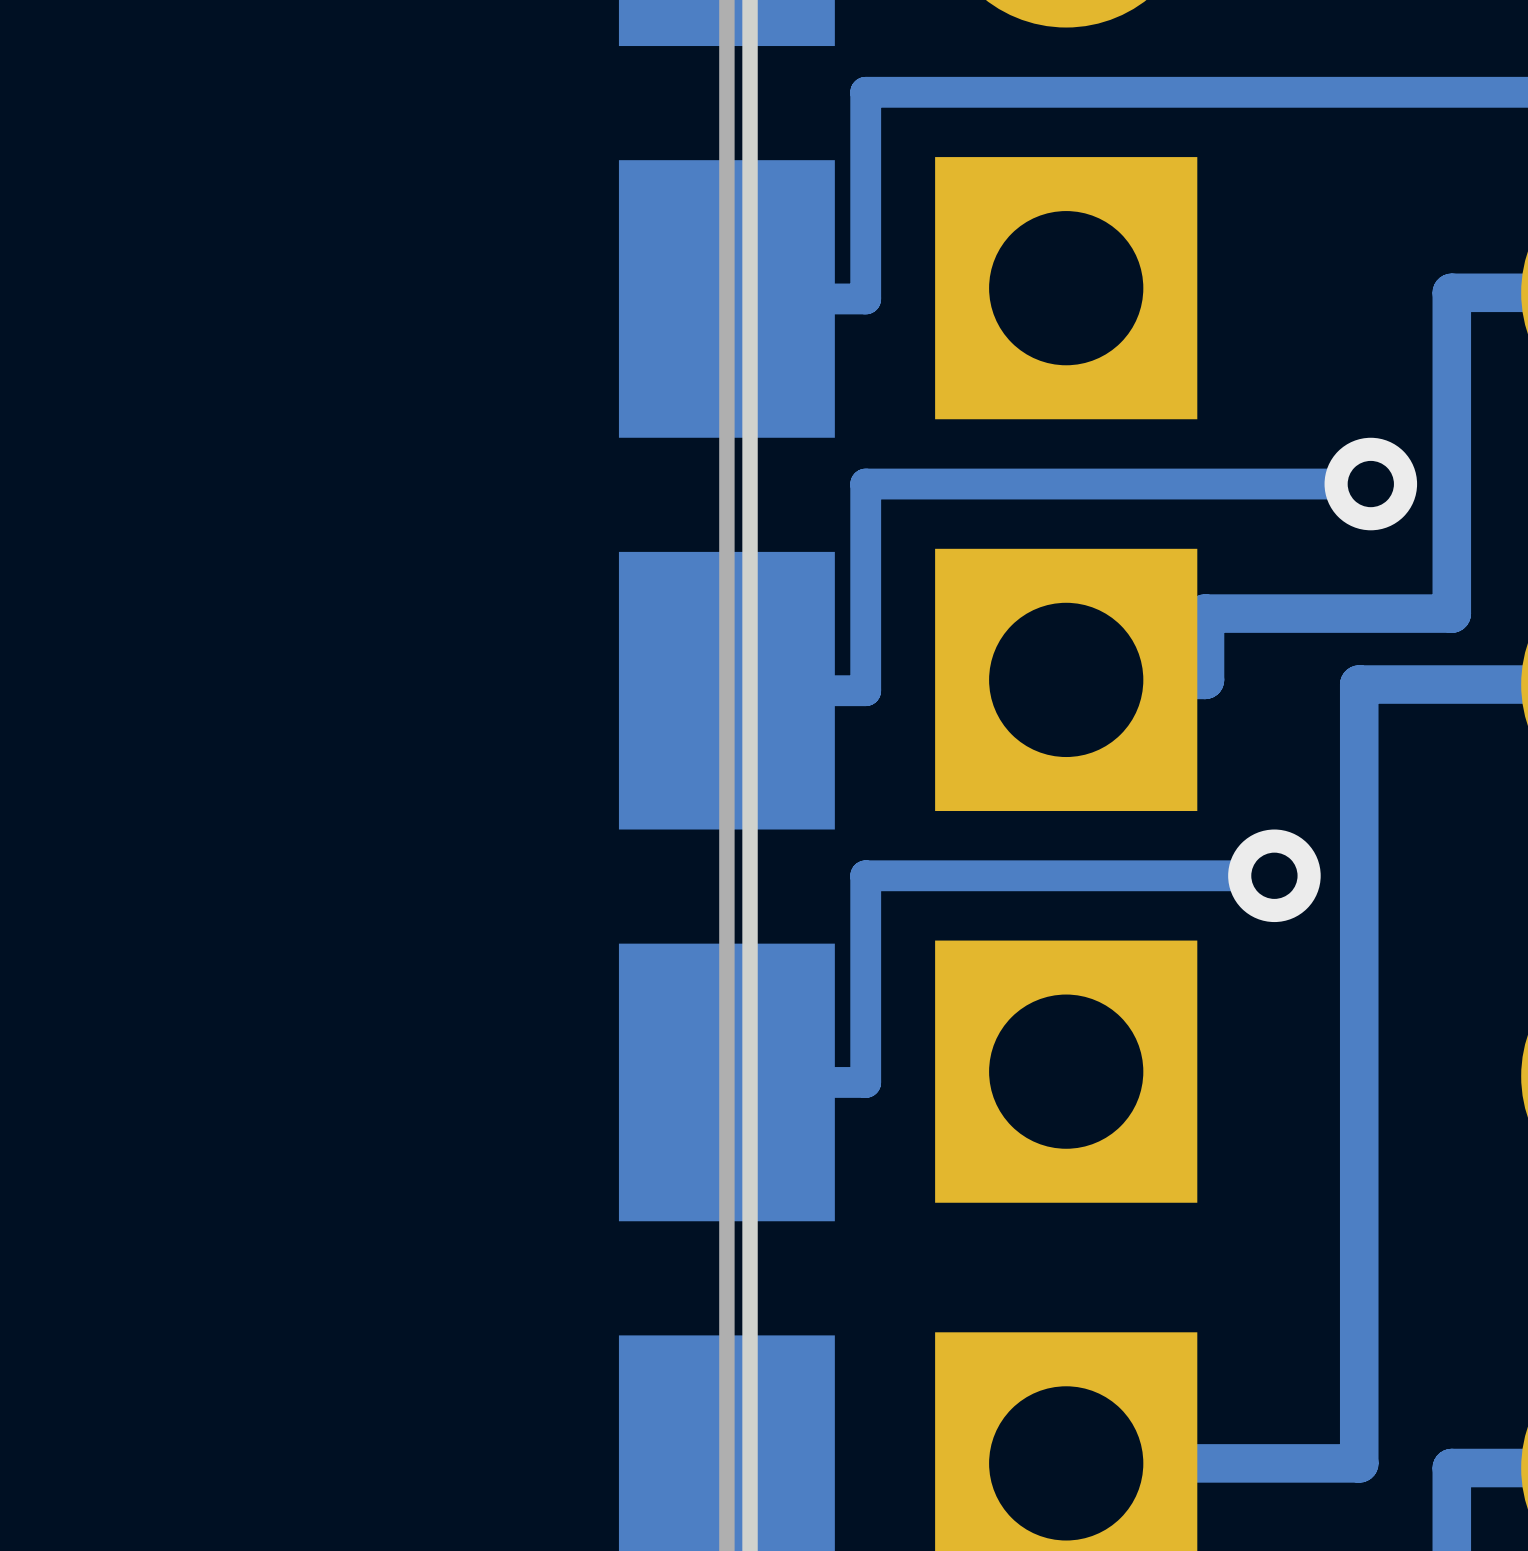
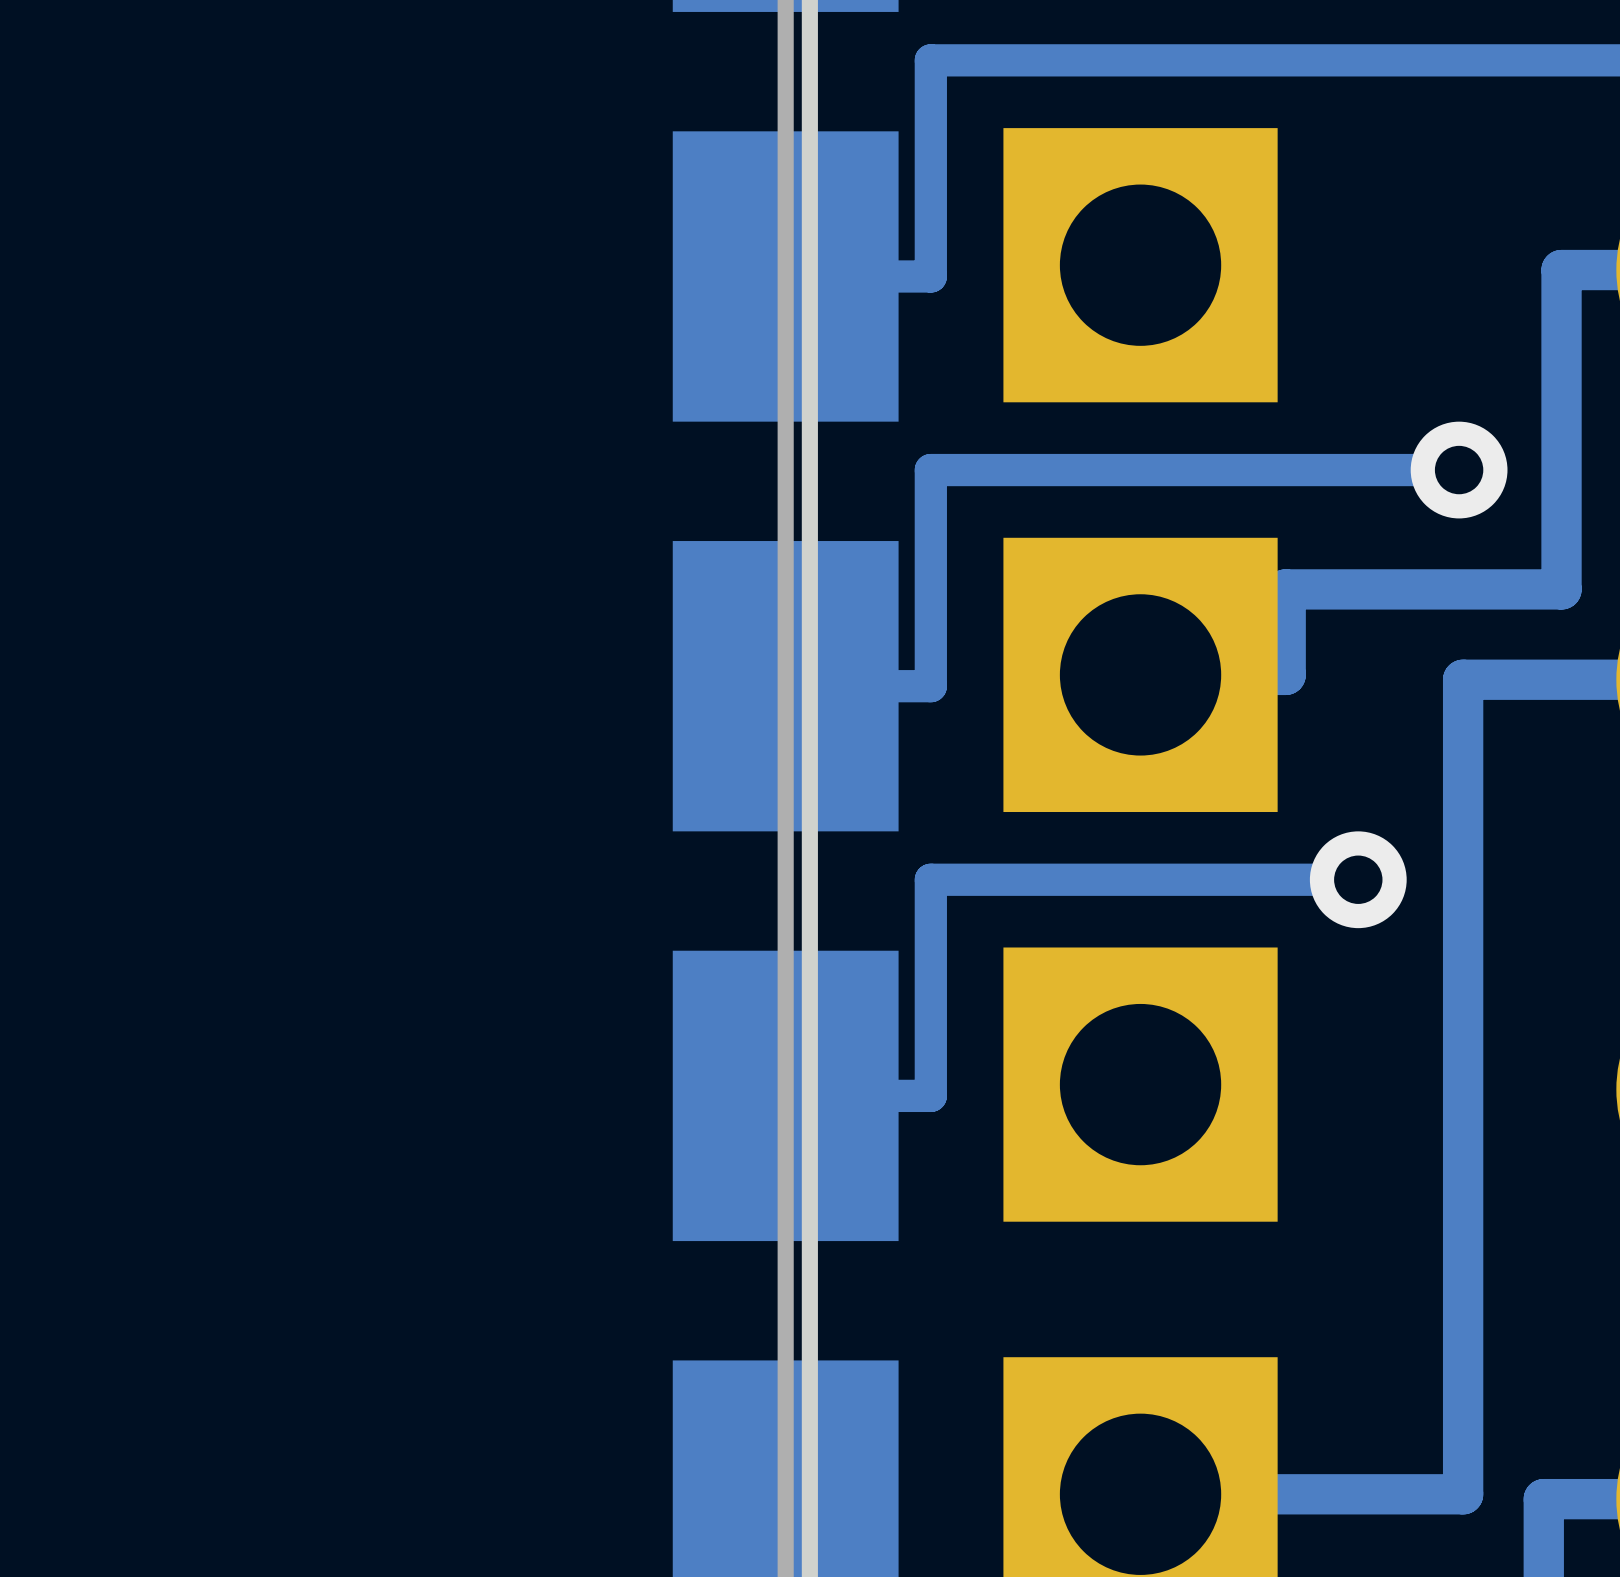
track: (1468, 292) (1451, 292) (1451, 613) (1205, 613) -> (1561, 270) (1561, 589) (1285, 589) (1285, 605)
track: (1374, 684) (1359, 684) (1359, 1463) -> (1463, 679) (1463, 1494) (1447, 1494)

